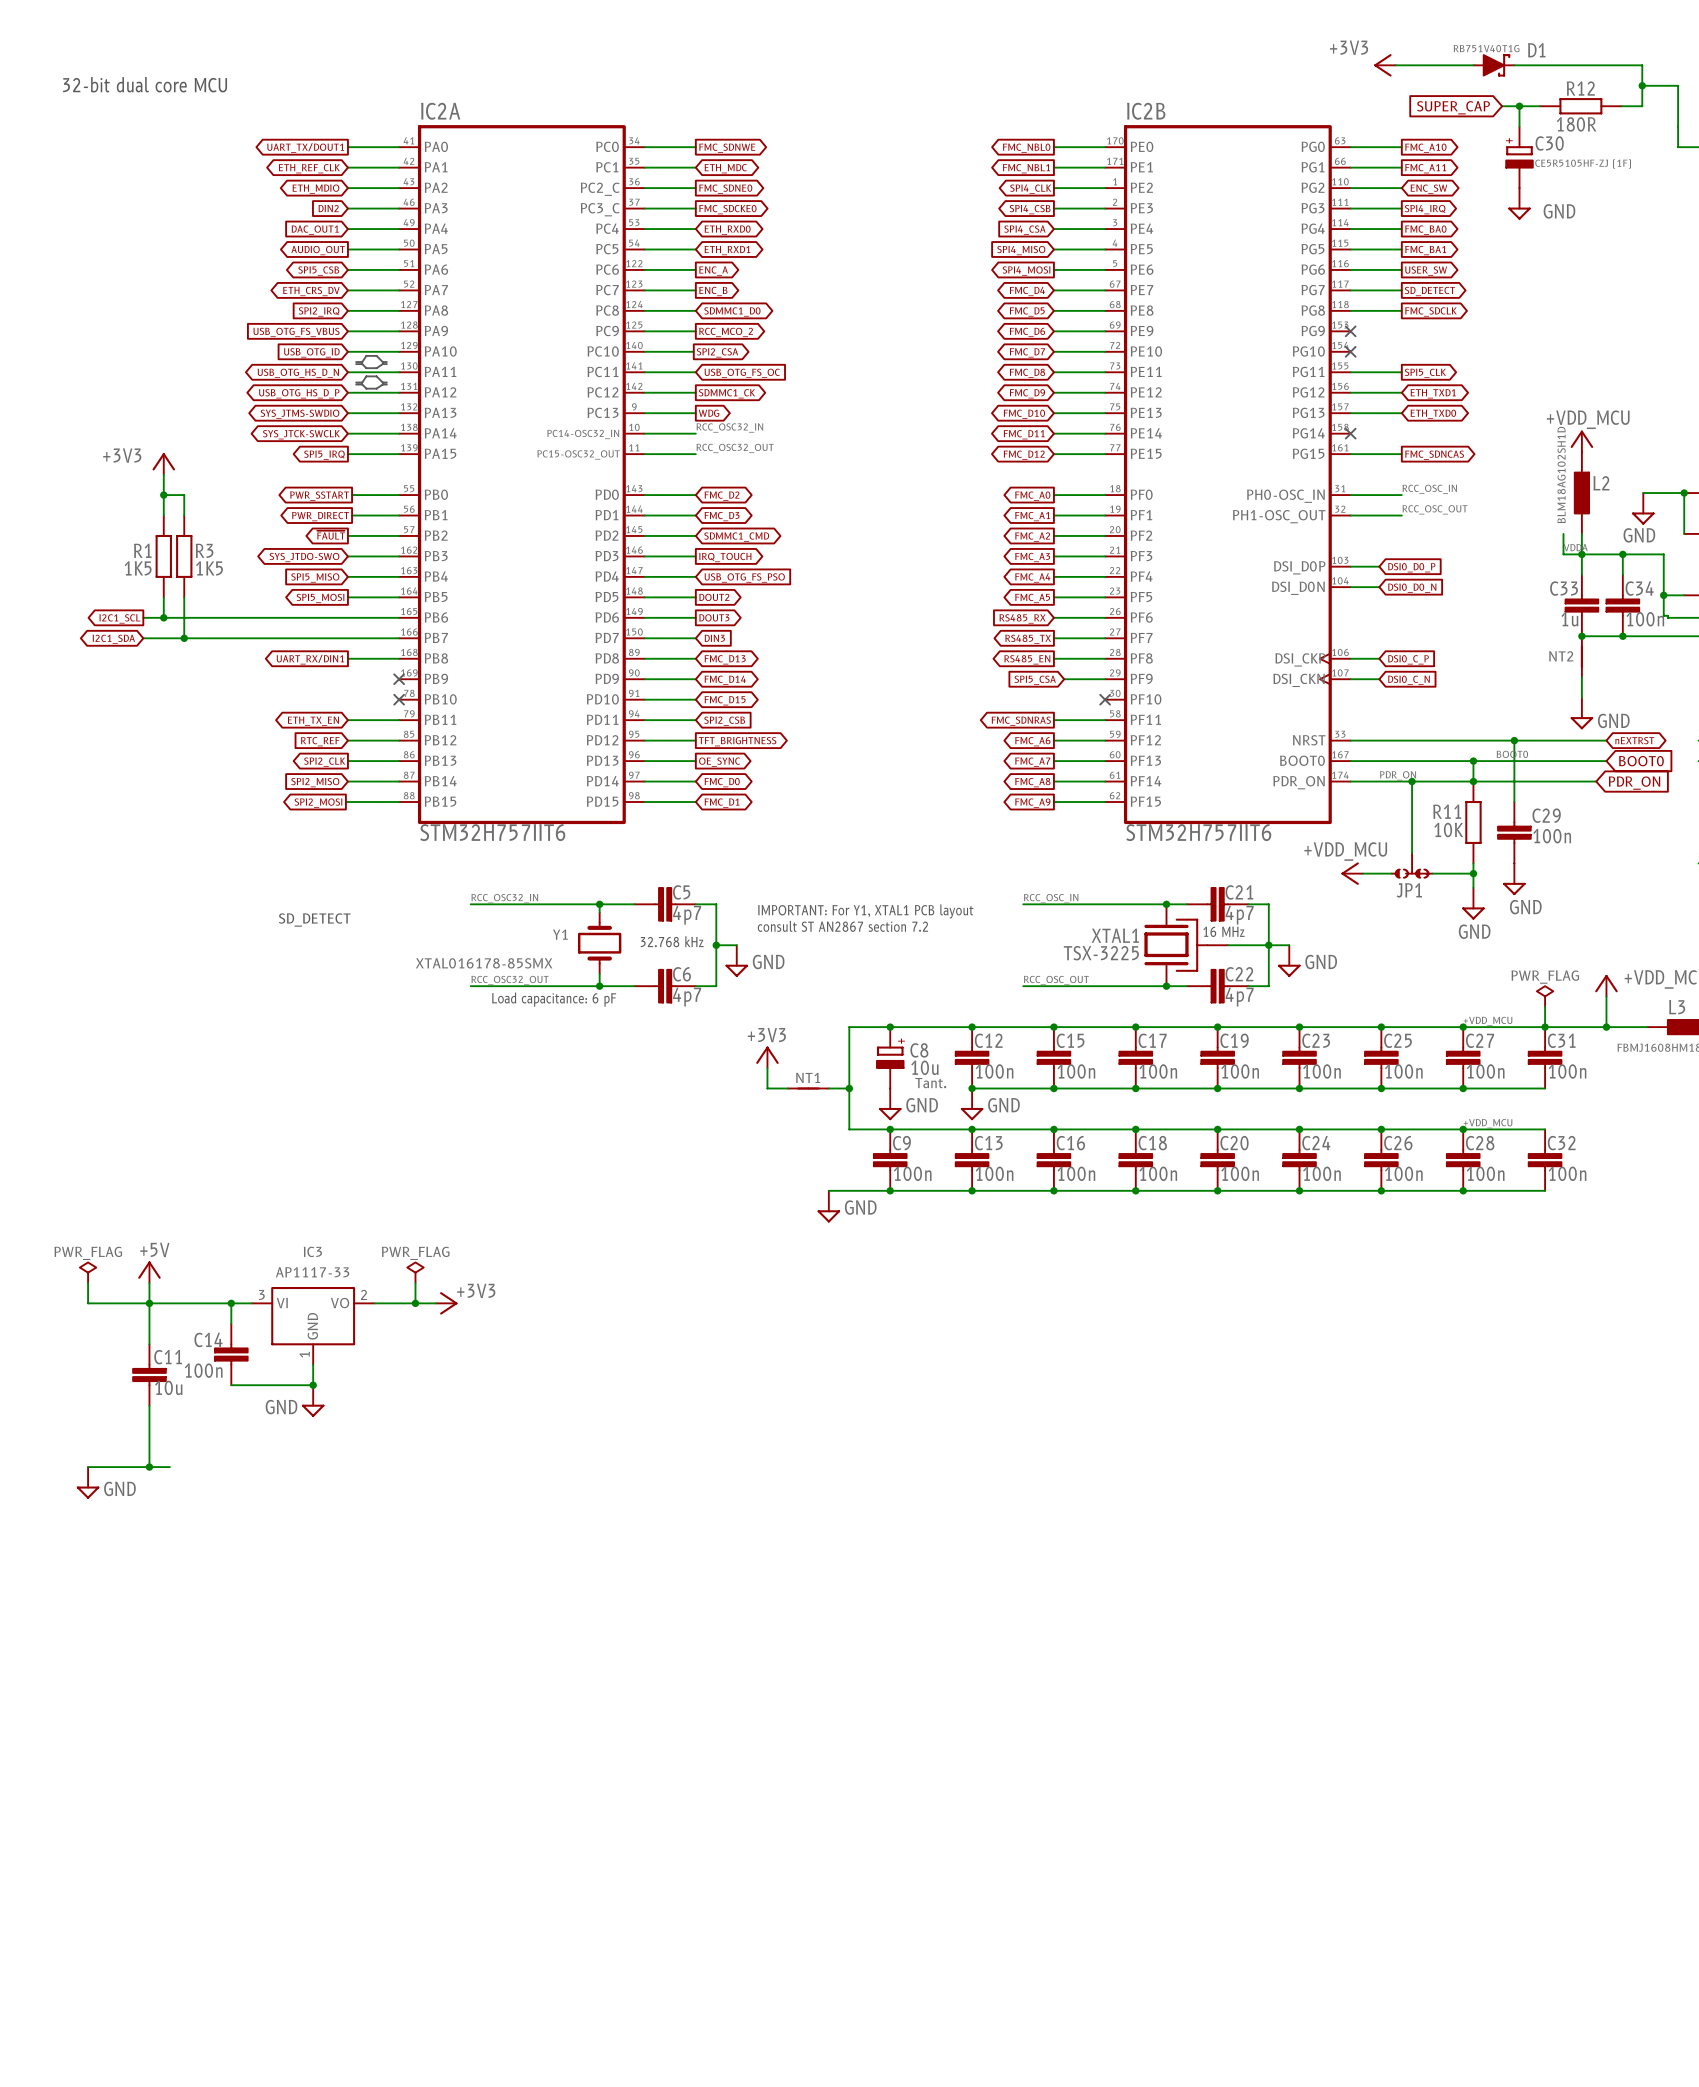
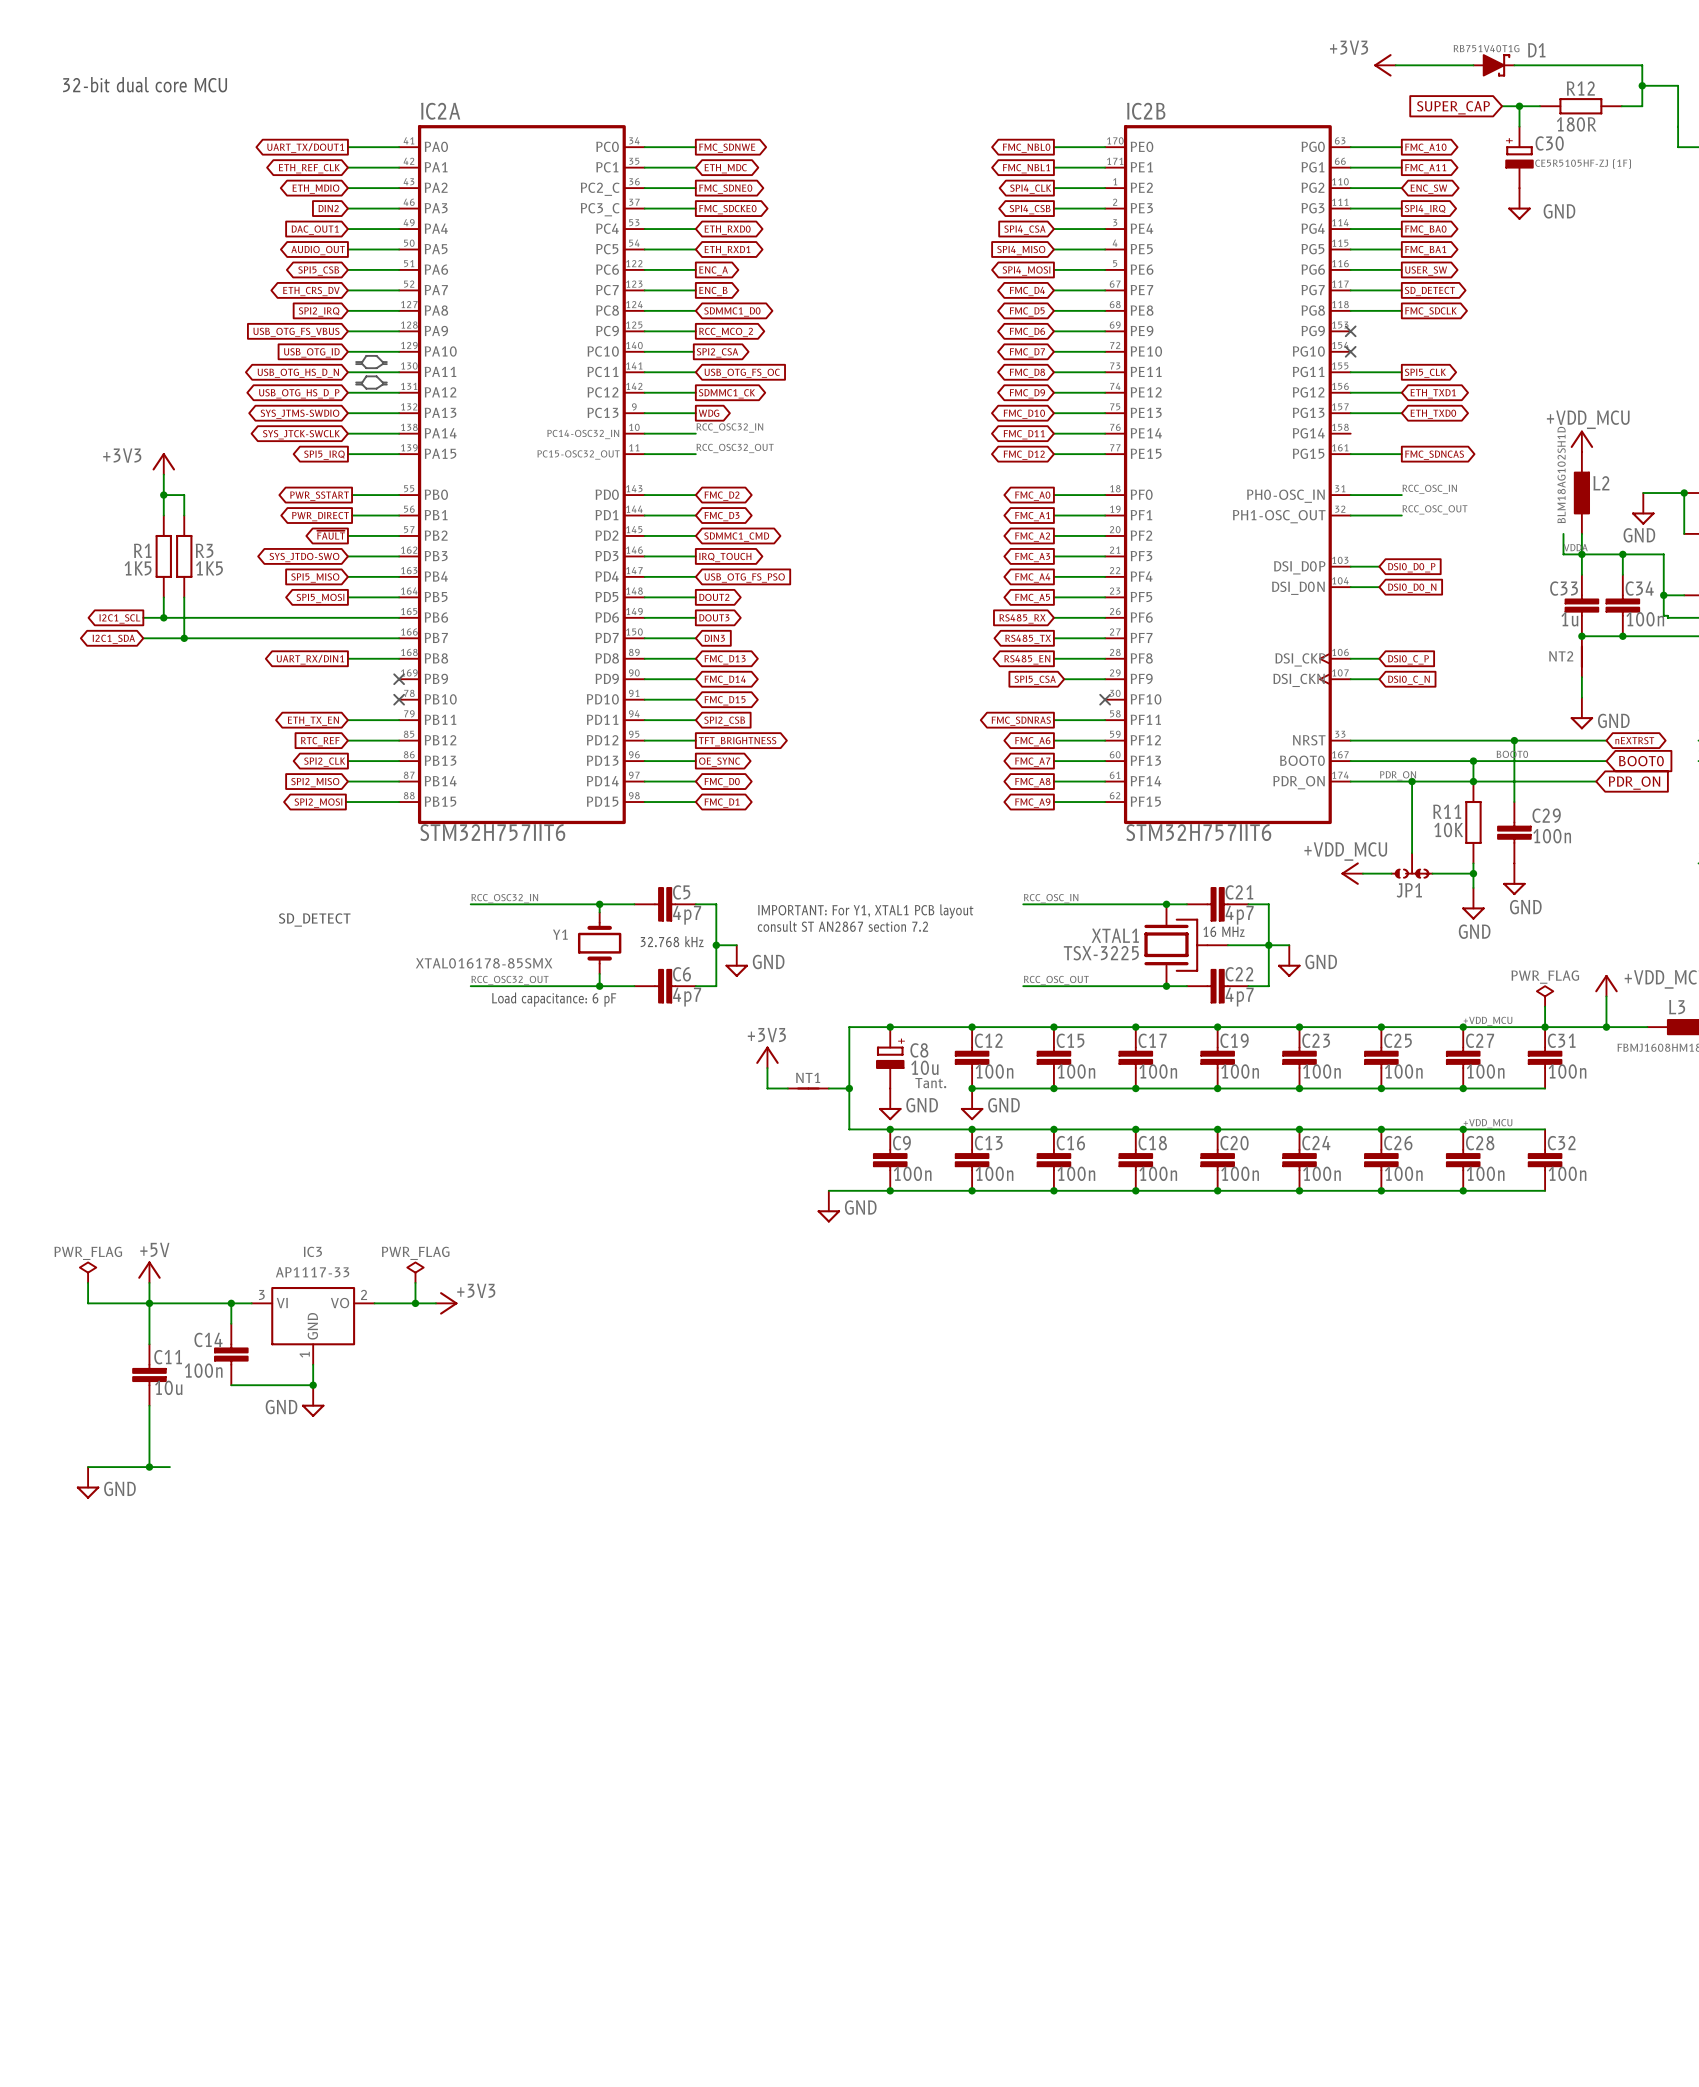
no-connect mark: (1350, 433) -> none

